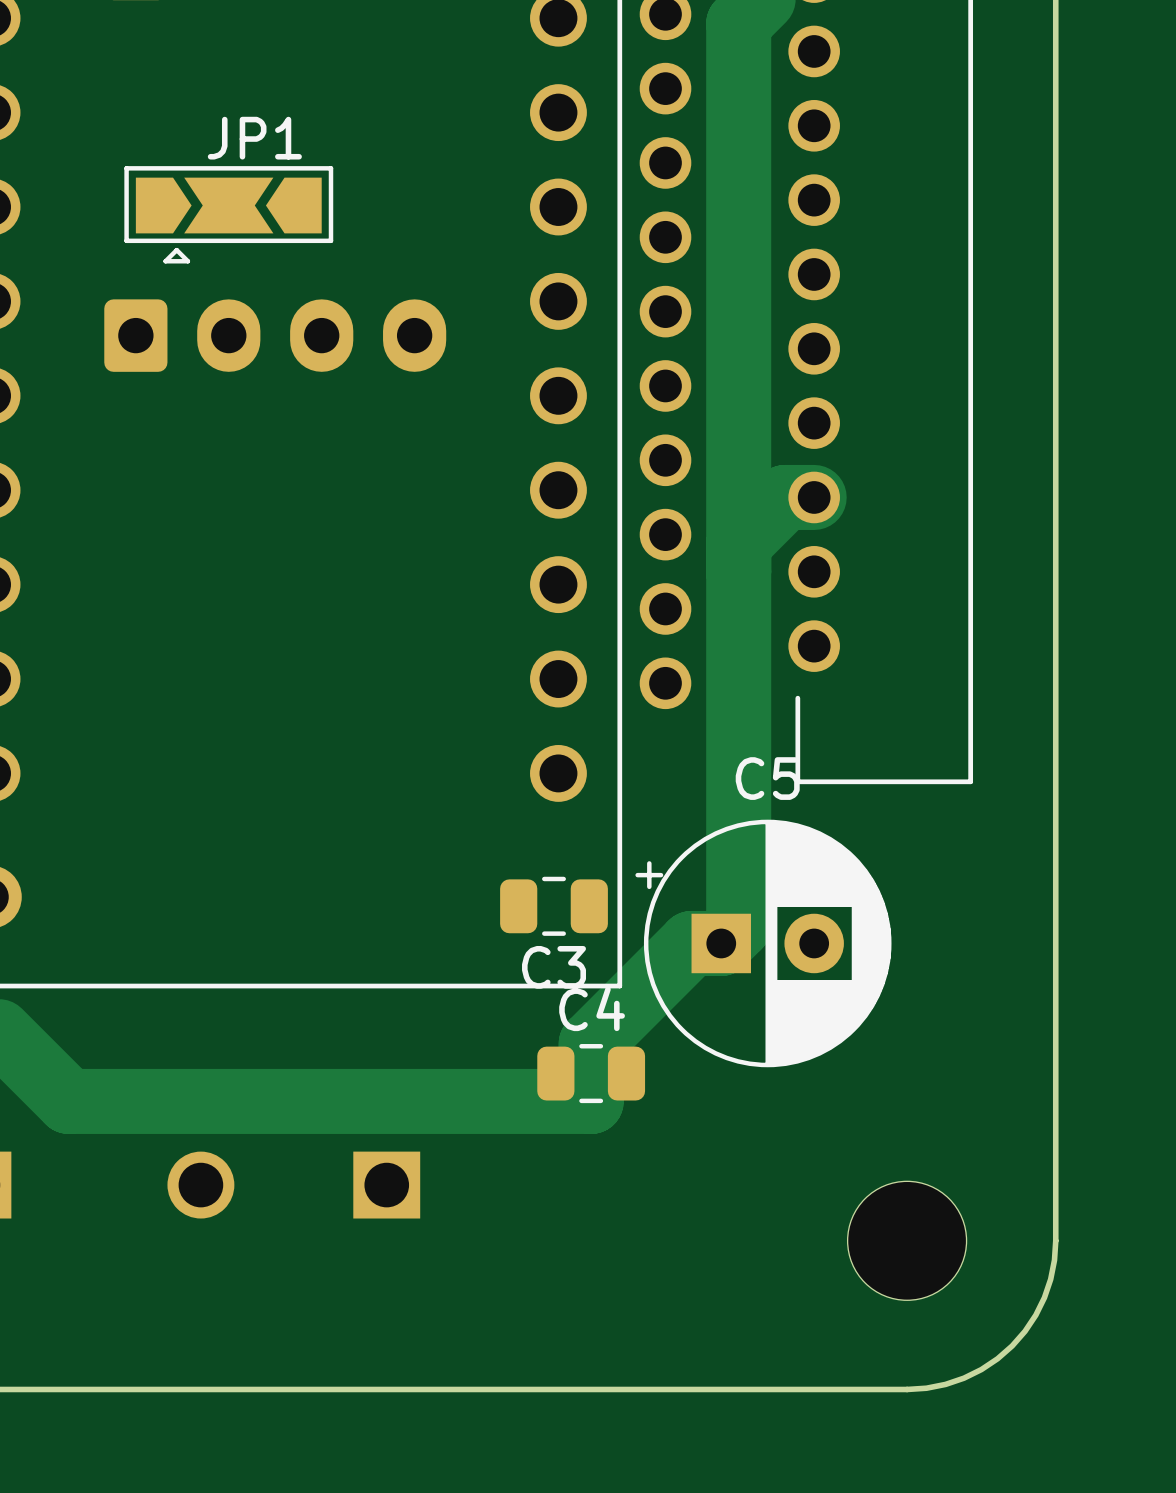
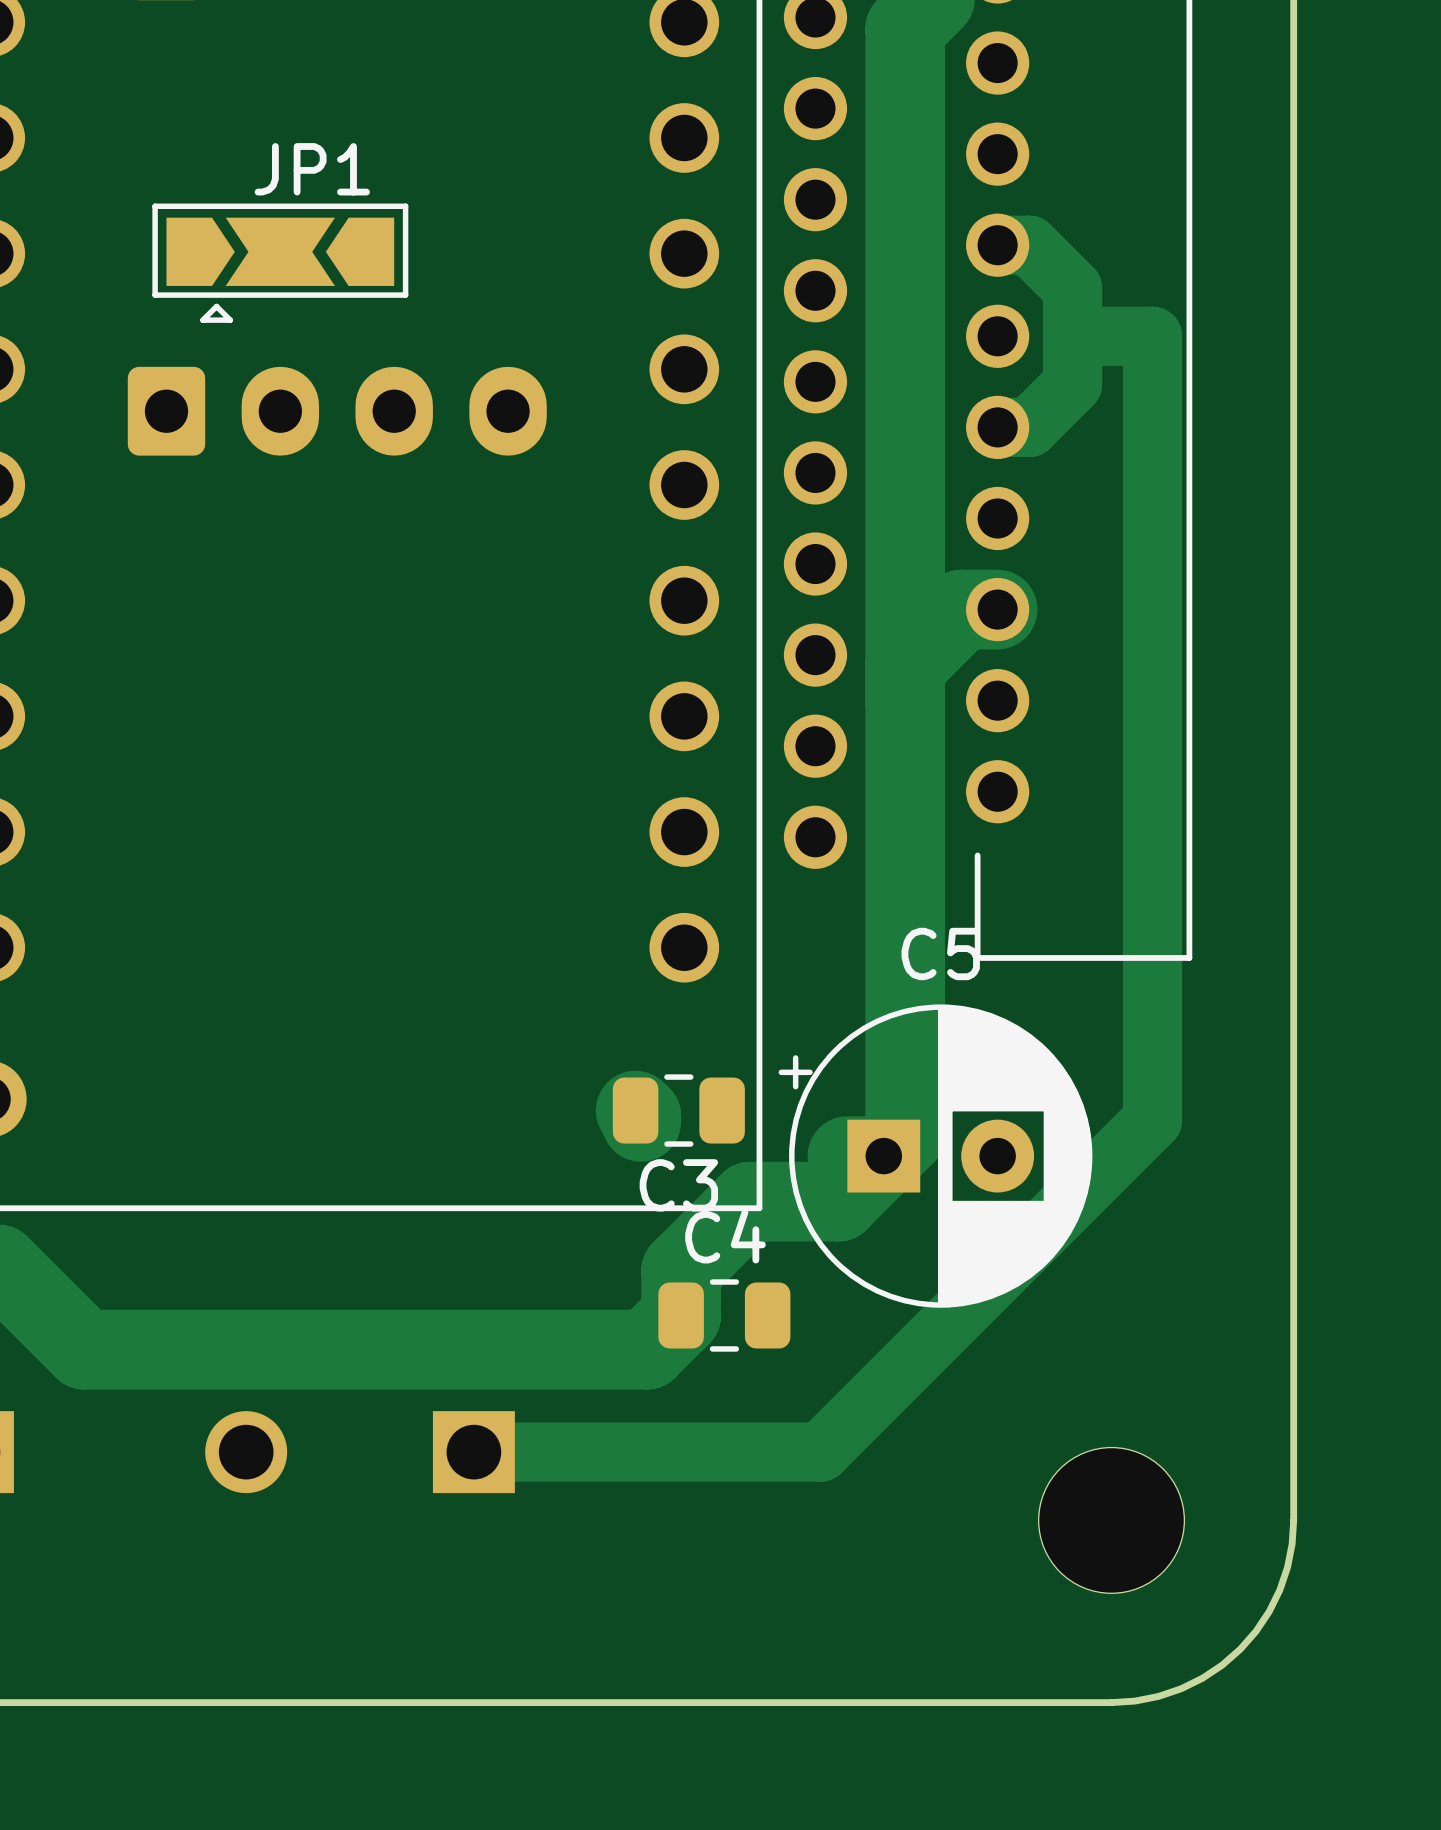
track: none -> (997, 245) (1029, 245) (1072, 288) (1072, 384) (1029, 427) (997, 427)
track: none -> (1072, 336) (1152, 336) (1152, 1120) (820, 1452) (473, 1452)
track: none -> (635, 1110) (641, 1116) (641, 1121)
track: (691, 943) (591, 1043) (591, 1101) (527, 1101) -> (883, 1156) (838, 1201) (750, 1201) (681, 1270) (681, 1315) (646, 1349)

